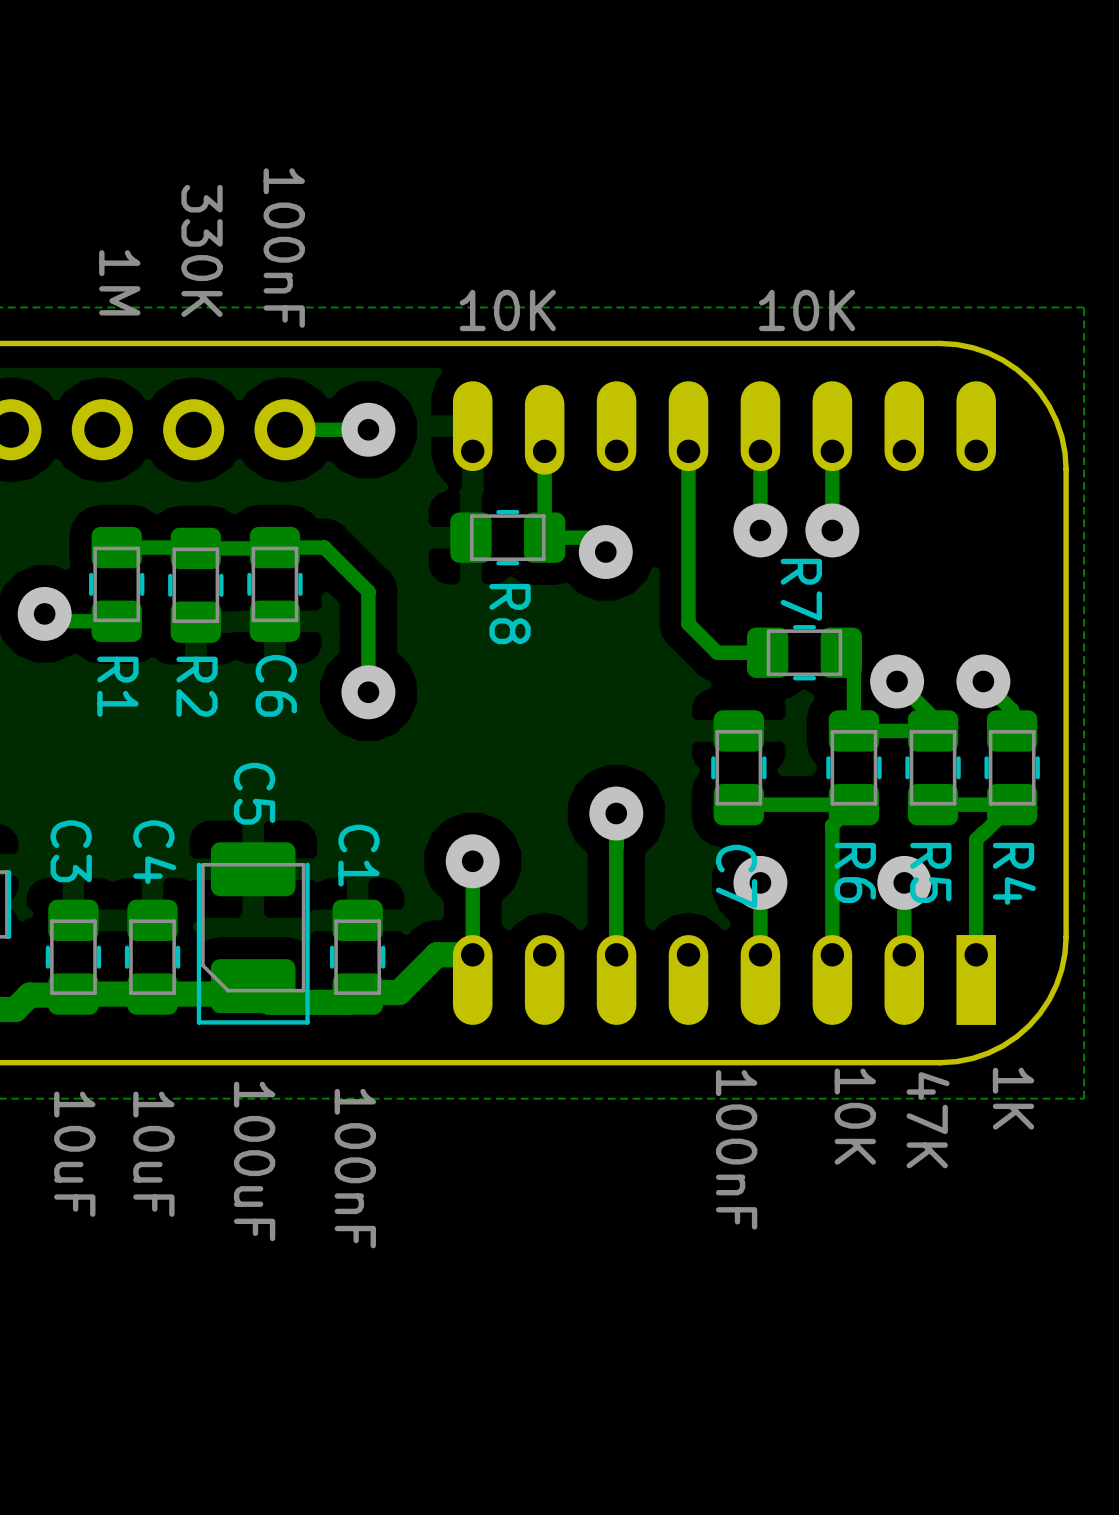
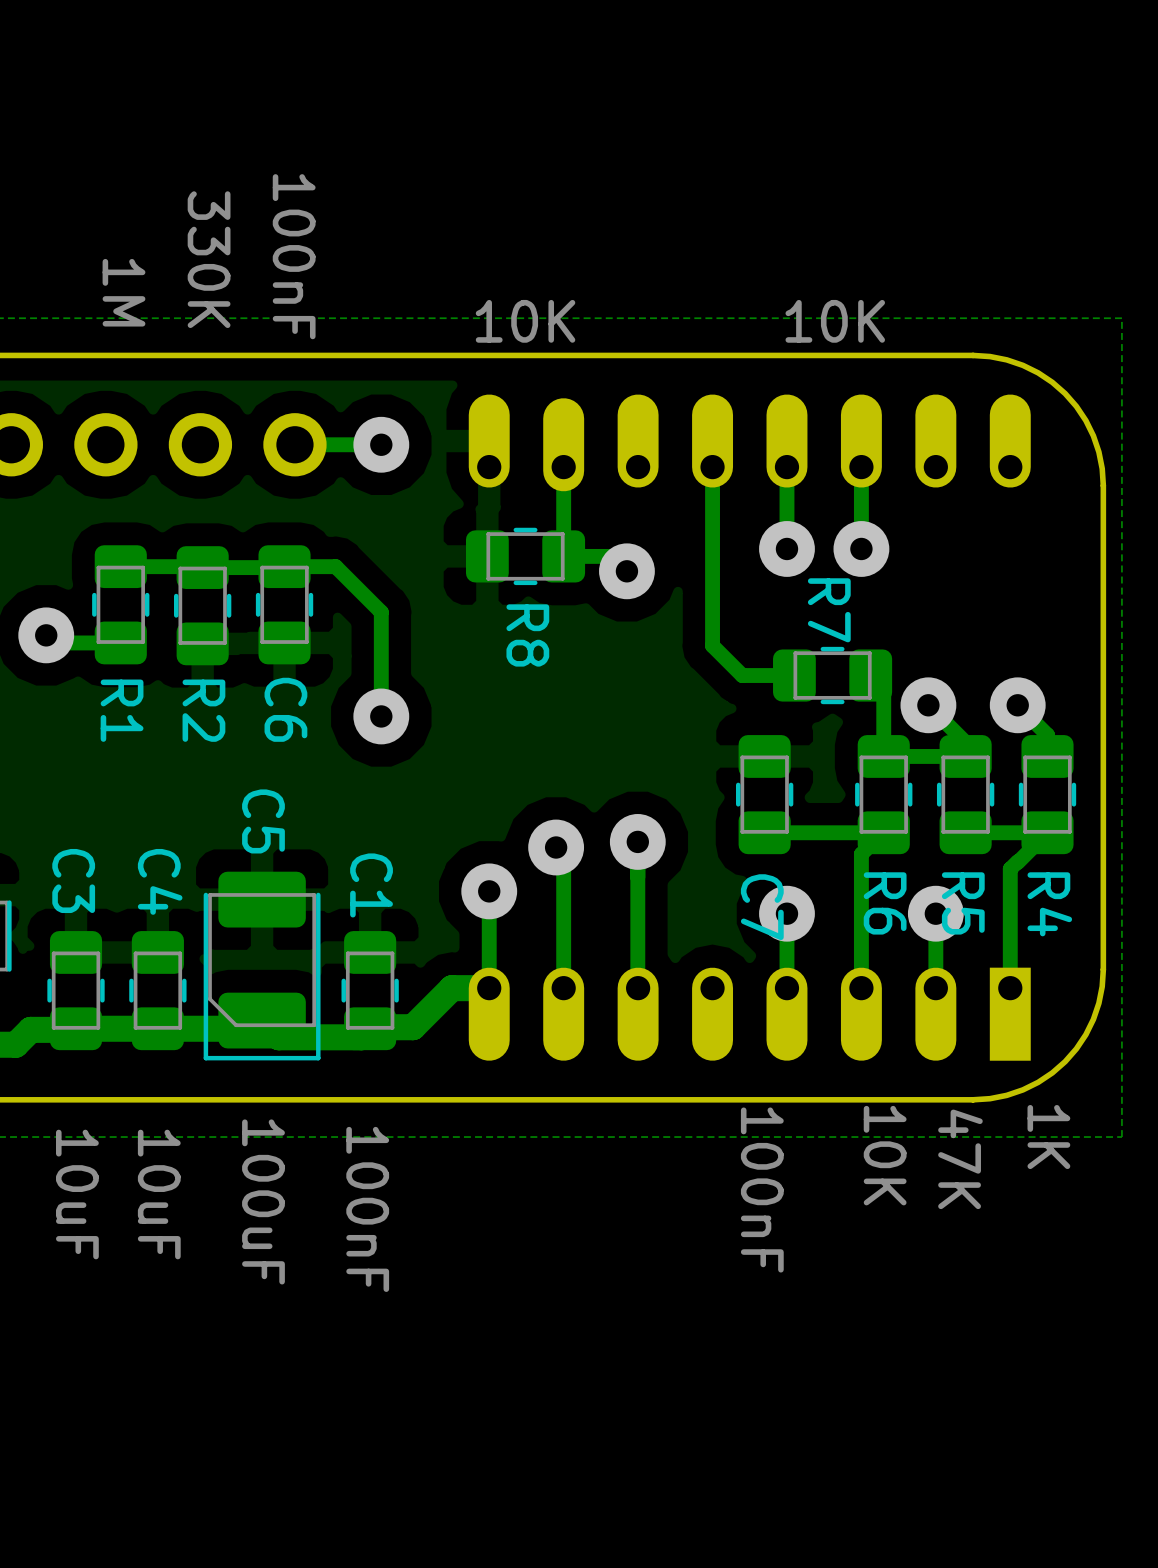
track: none -> (556, 847) (563, 855) (563, 988)
via: none -> (556, 847)

